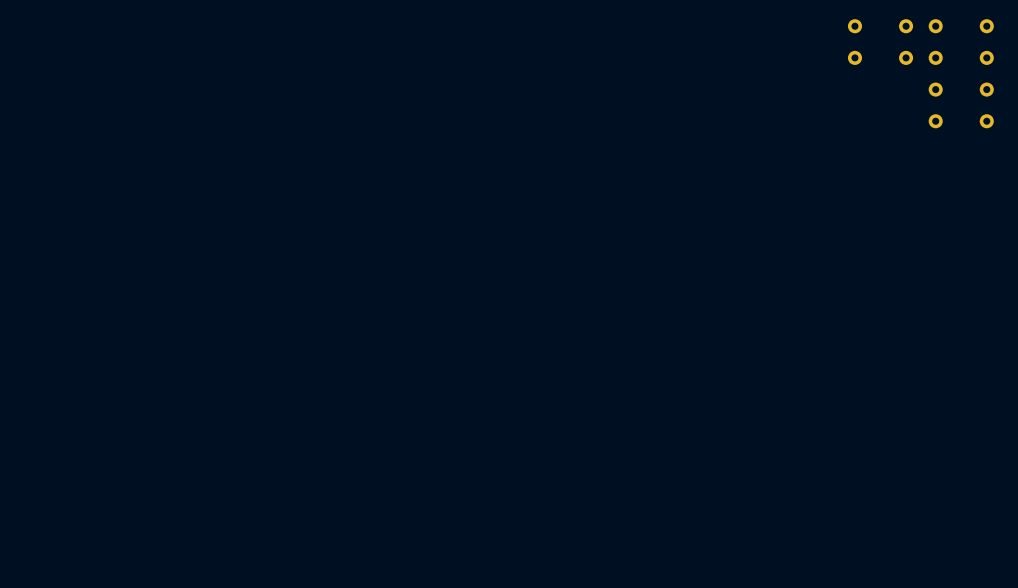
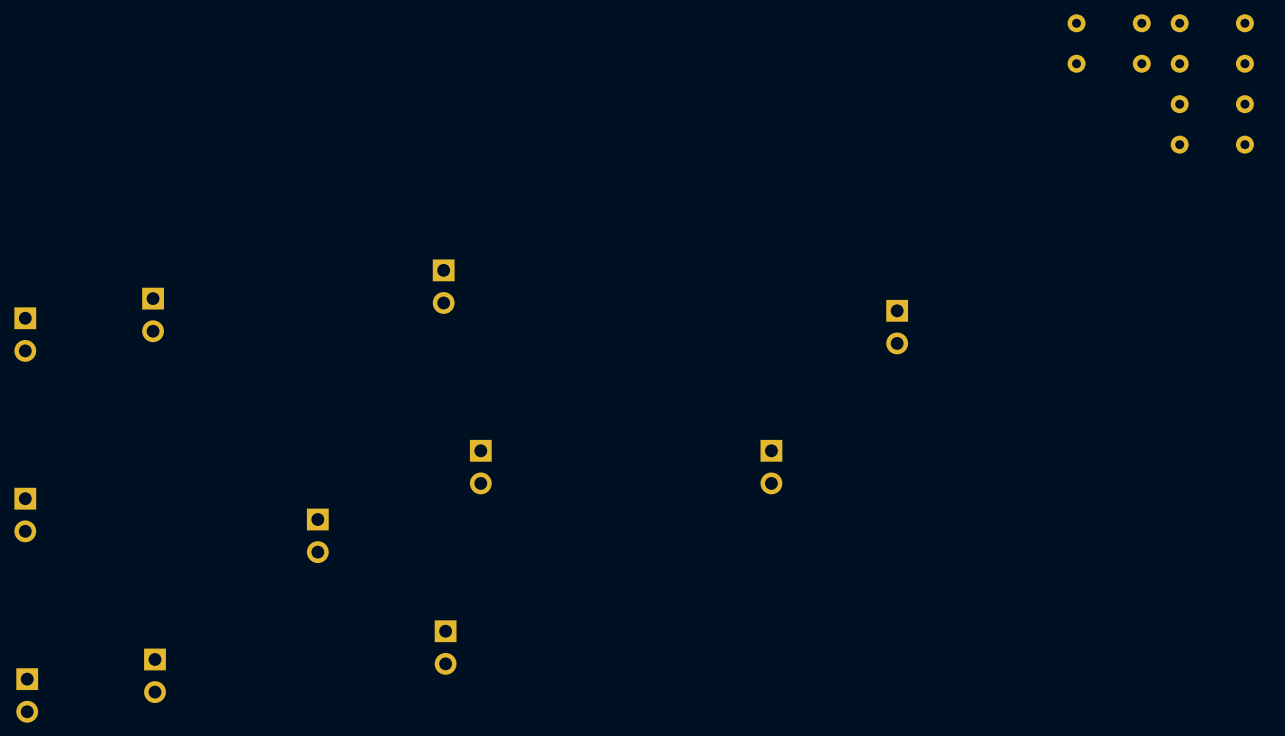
part: none -> (443, 286)
part: none -> (153, 314)
part: none -> (897, 327)
part: none -> (25, 334)
part: none -> (480, 467)
part: none -> (771, 467)
part: none -> (25, 515)
part: none -> (317, 535)
part: none -> (445, 647)
part: none -> (154, 675)
part: none -> (27, 695)

